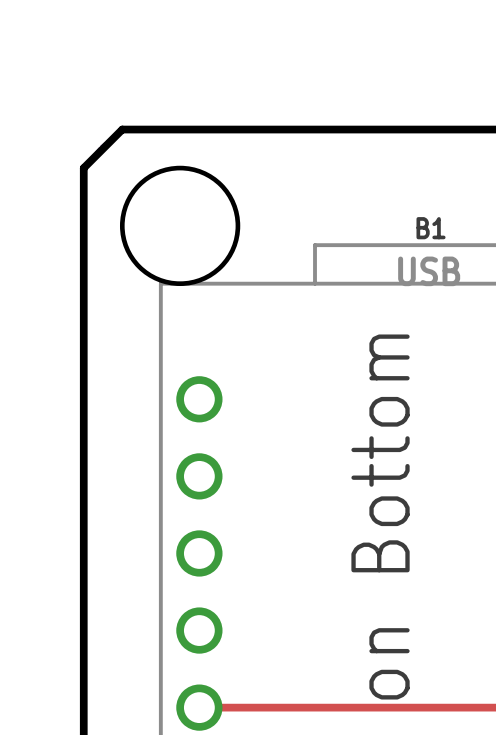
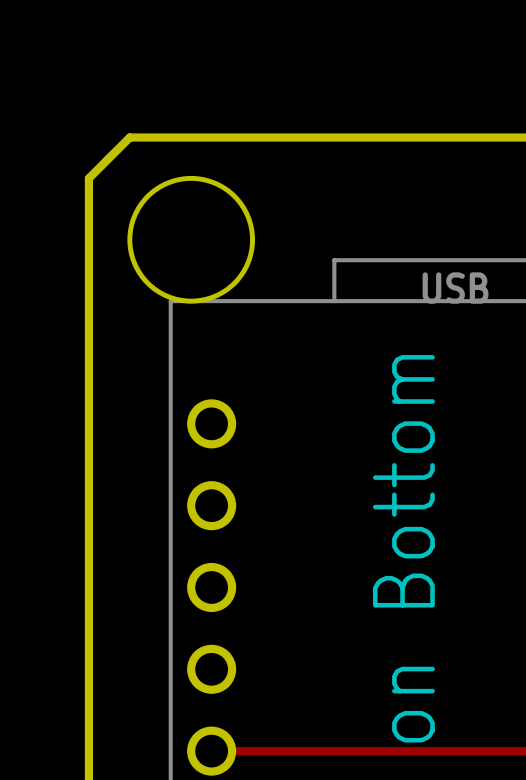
B1 name: B1 (431, 228) -> none

